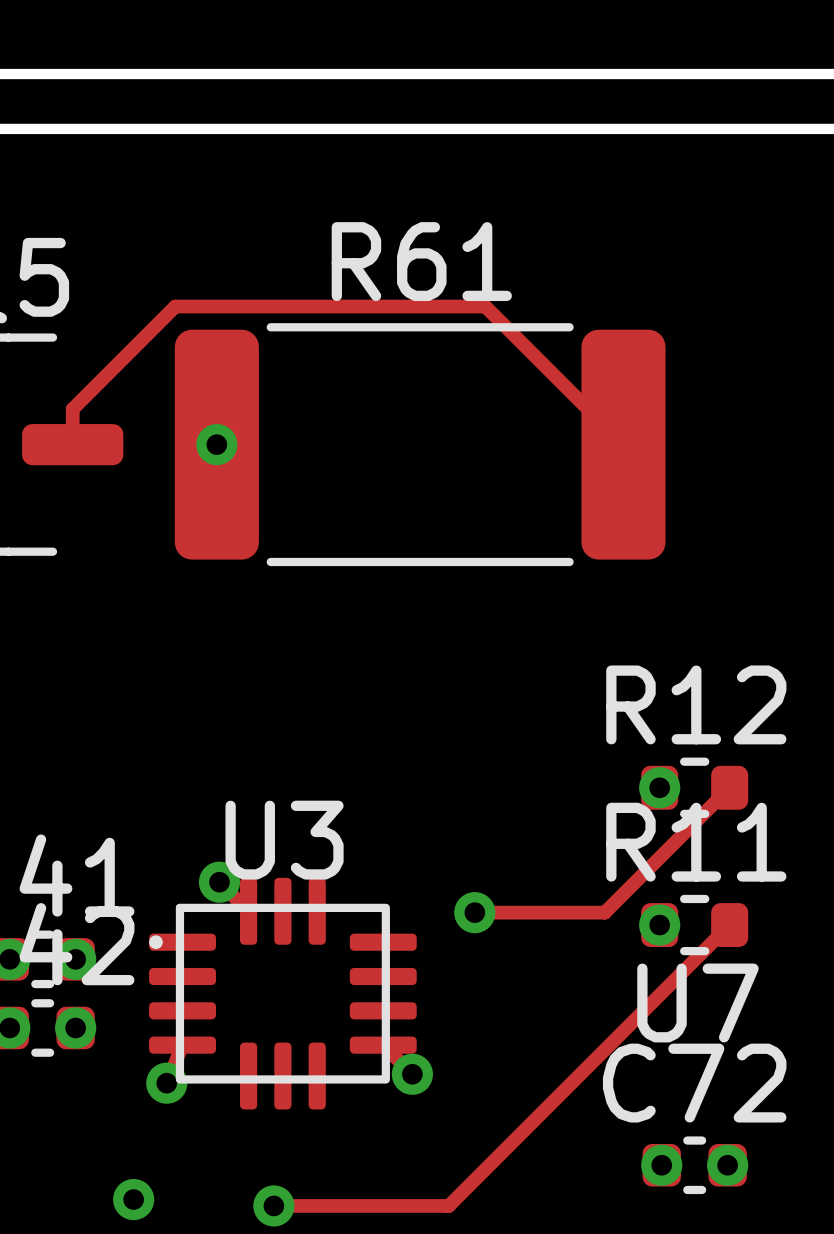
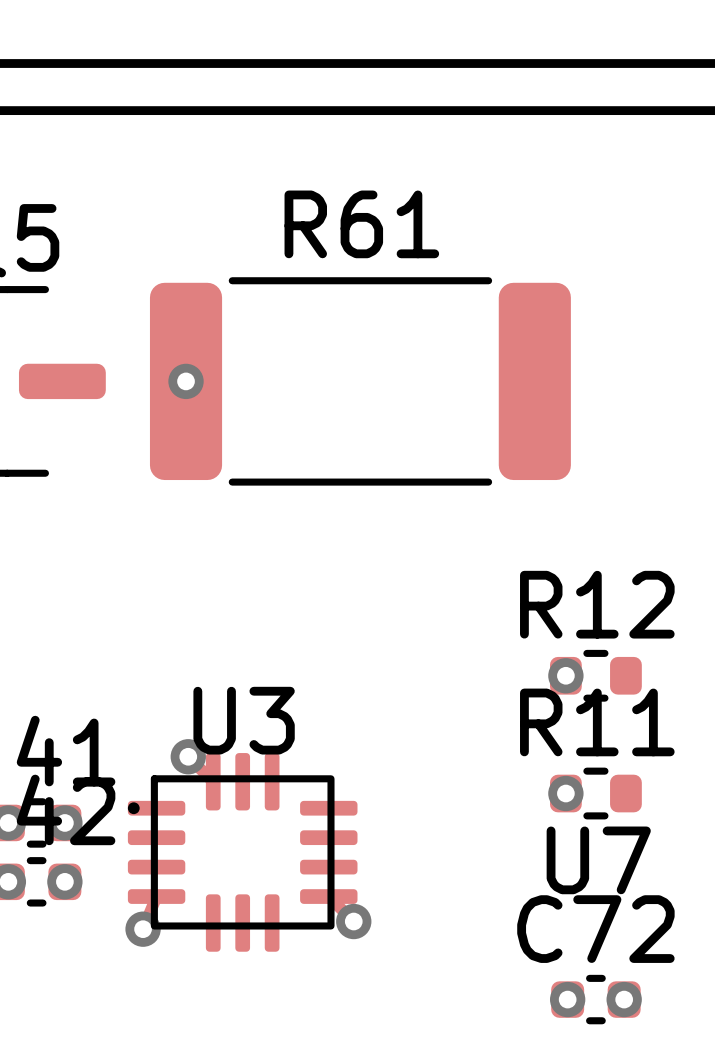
track: (72, 444) (72, 409) (175, 306) (485, 306) (623, 444) -> none
track: (729, 787) (604, 912) (474, 912) -> none
via: (474, 912) -> none
track: (729, 925) (448, 1205) (273, 1205) -> none
via: (133, 1199) -> none
via: (273, 1205) -> none

